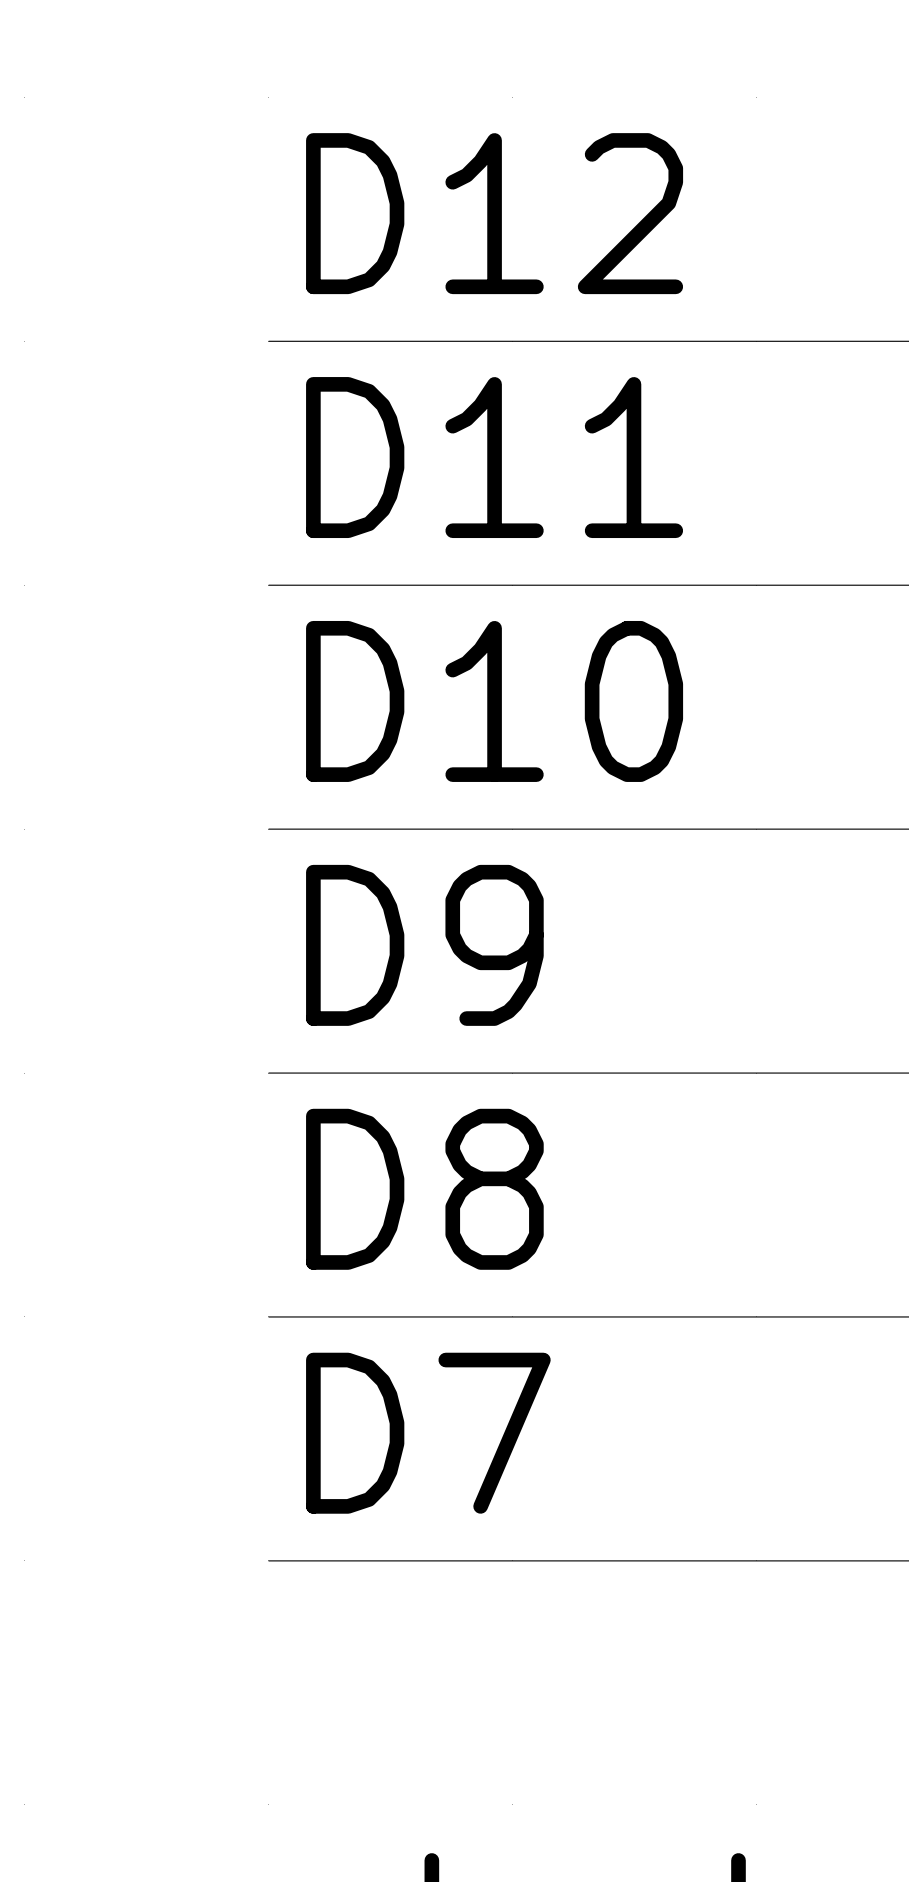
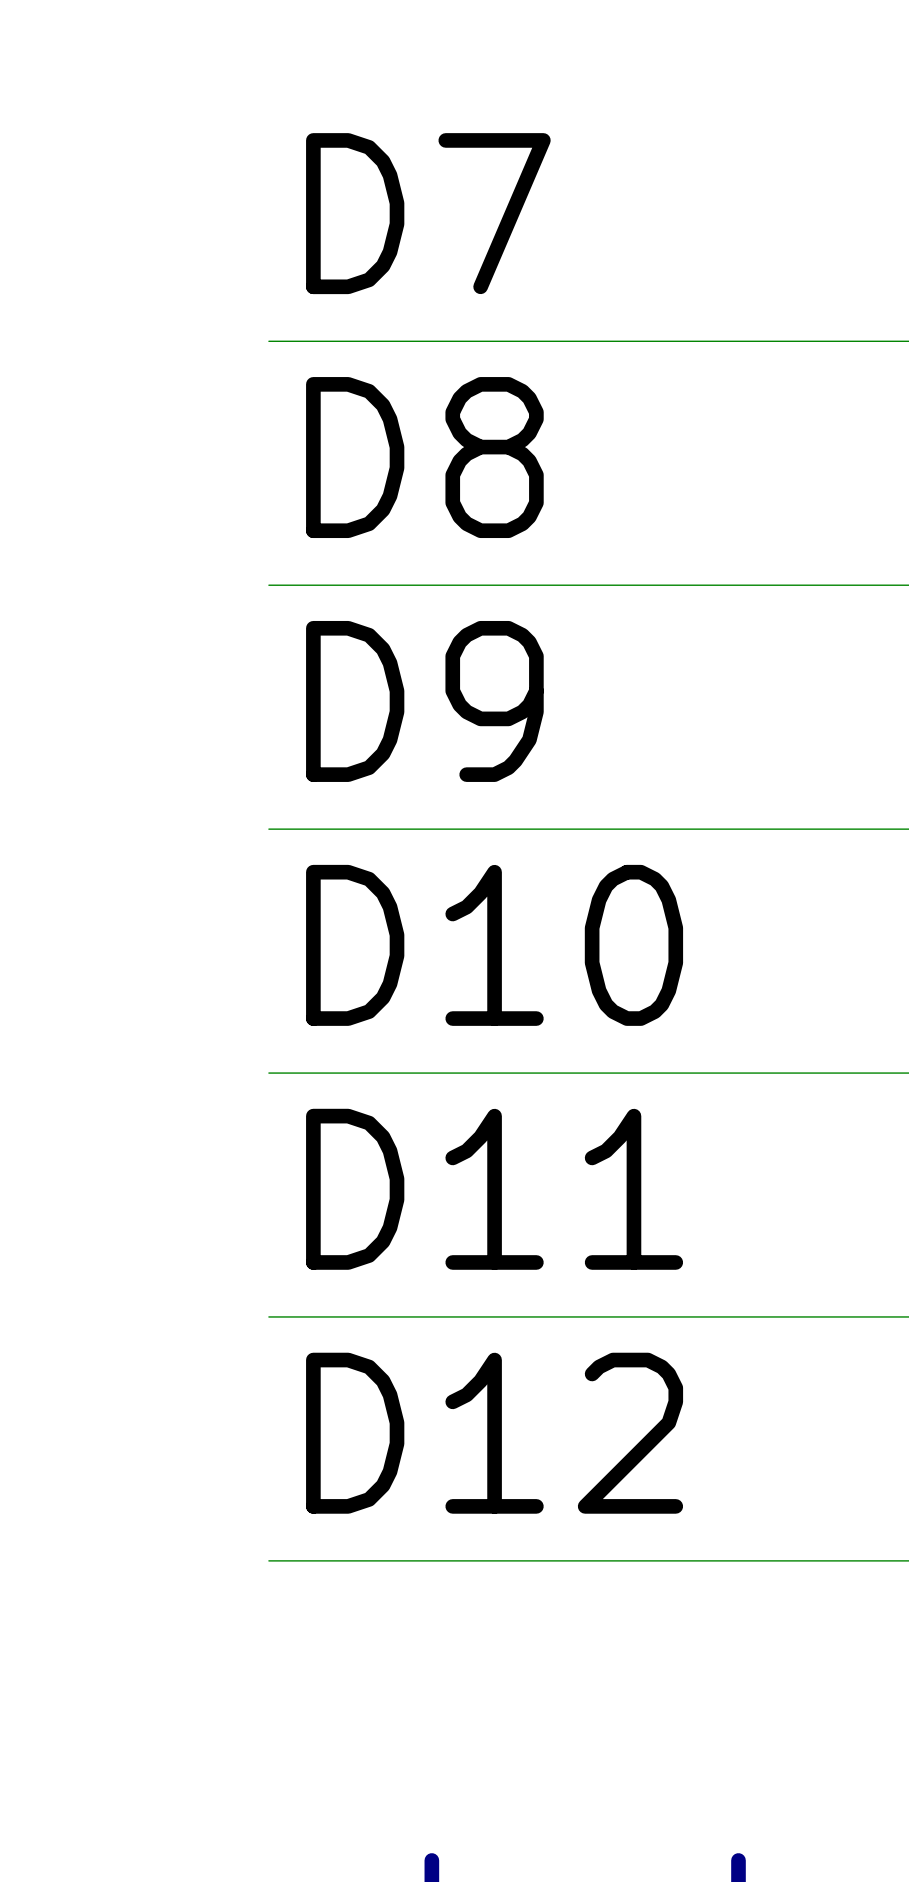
label: D12 (494, 213) -> D7 (428, 213)
label: D11 (494, 457) -> D8 (424, 457)
label: D10 (494, 701) -> D9 (424, 701)
label: D9 (424, 945) -> D10 (494, 945)
label: D8 (424, 1189) -> D11 (494, 1189)
label: D7 (428, 1433) -> D12 (494, 1433)

